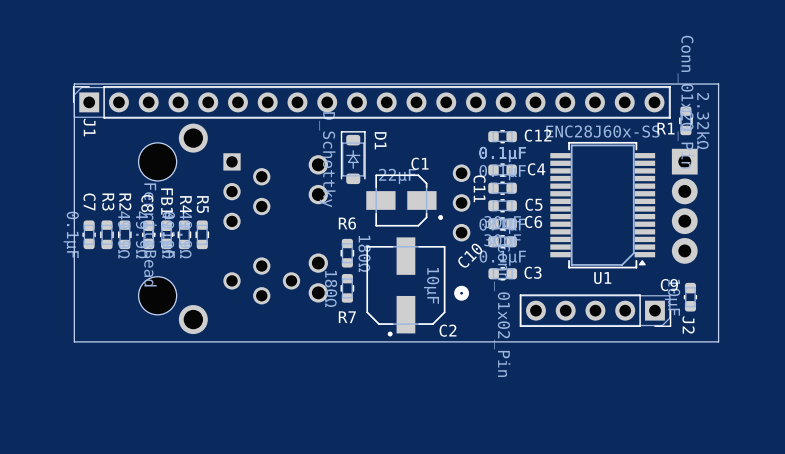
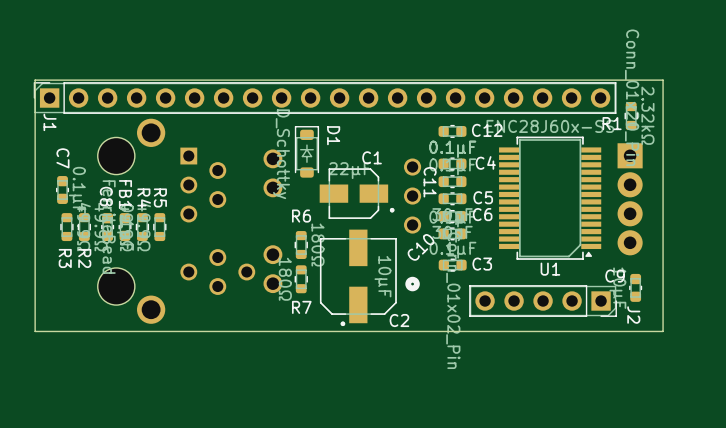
R2 name position: R2 (125, 201) -> R2 (84, 258)
R3 name position: R3 (108, 202) -> R3 (65, 258)
C7 value position: 0.1µF (71, 234) -> 0.1µF (77, 190)
C7 position: (89, 234) -> (62, 190)

